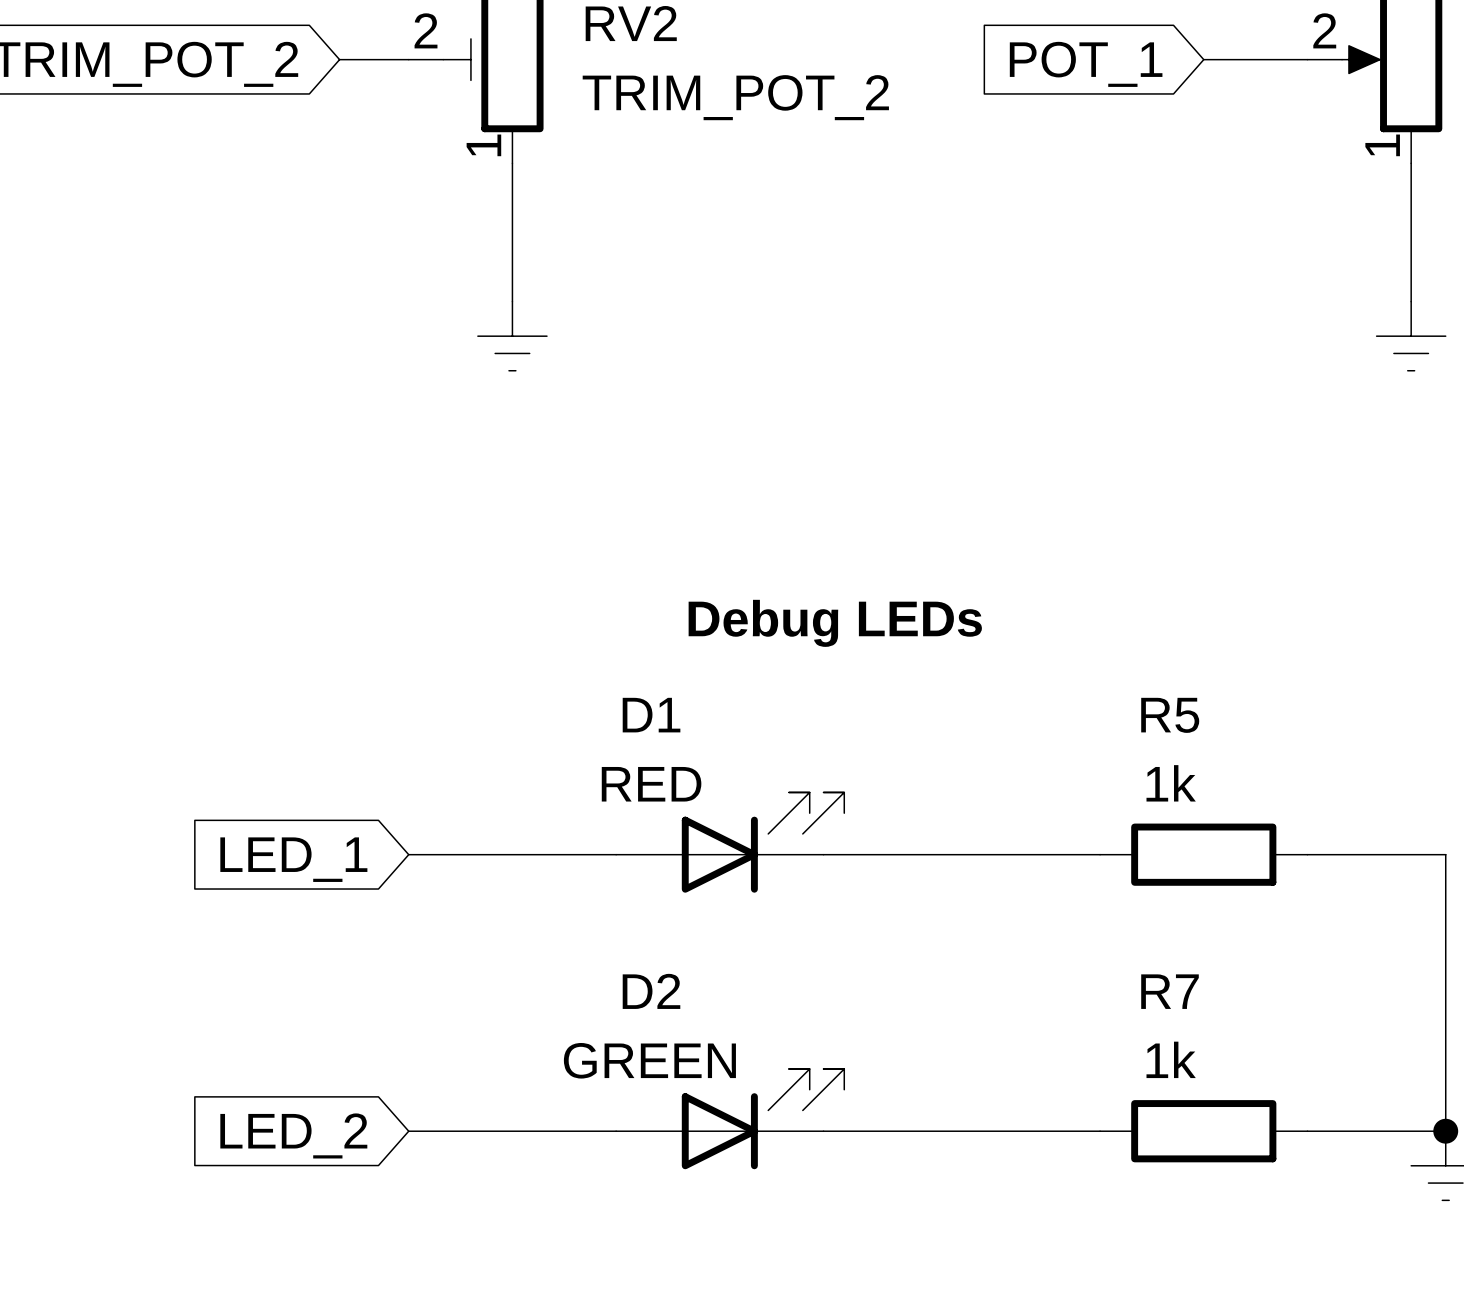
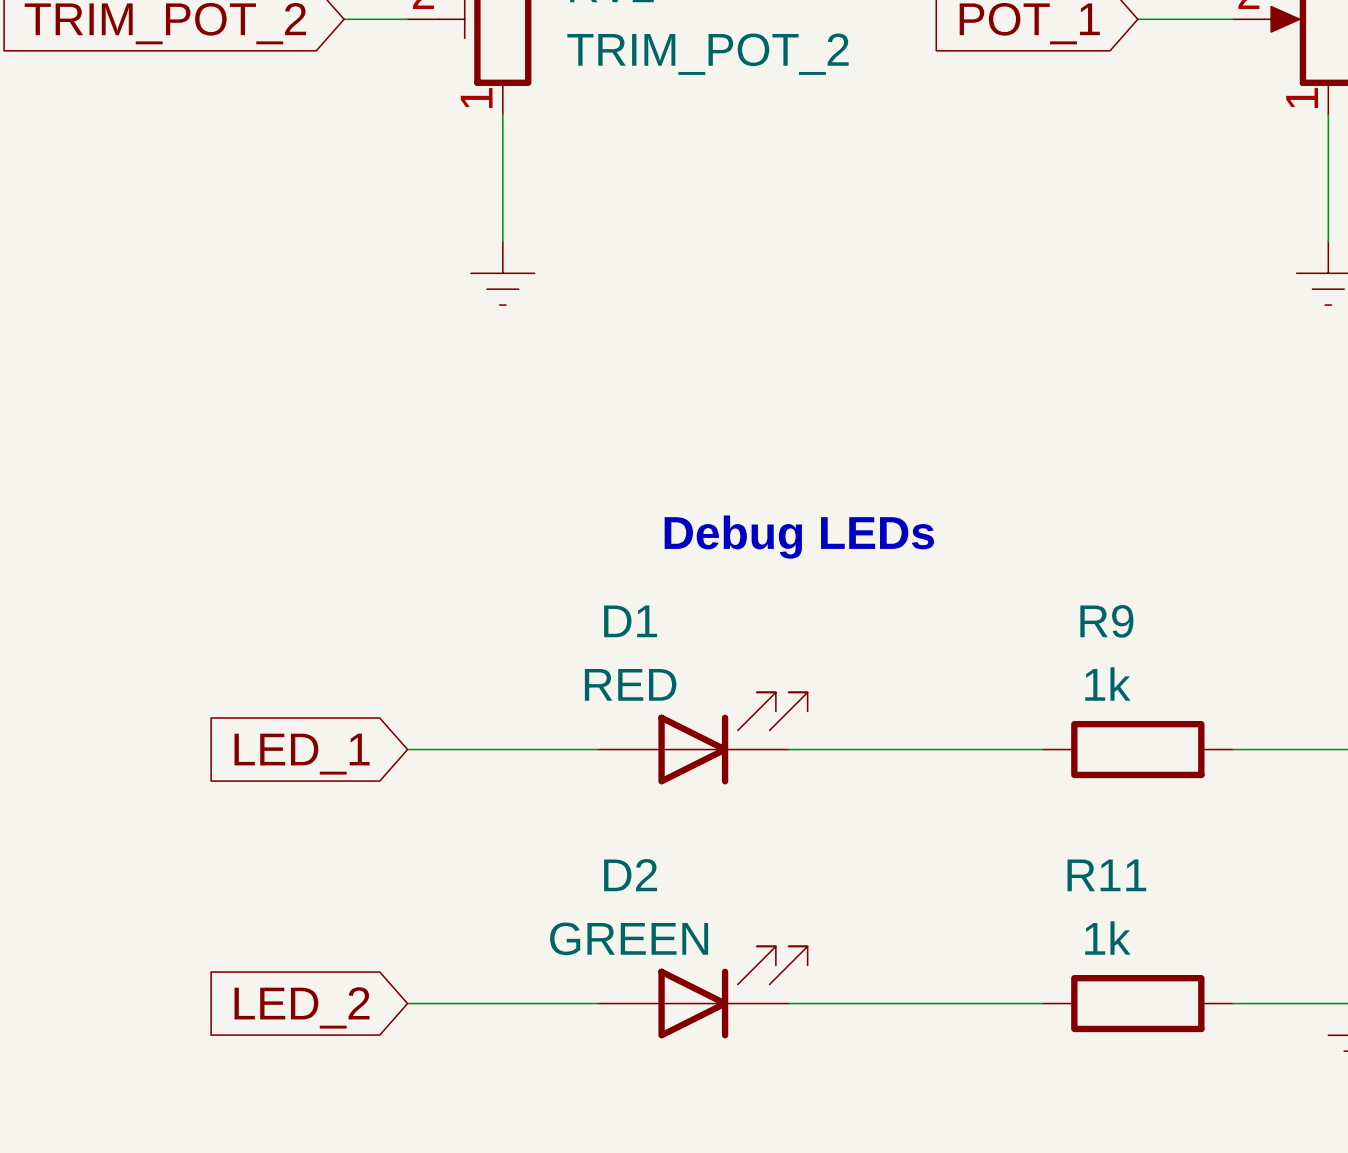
R5 name: R5 (1170, 715) -> R9 (1106, 621)
R7 name: R7 (1170, 991) -> R11 (1106, 875)

